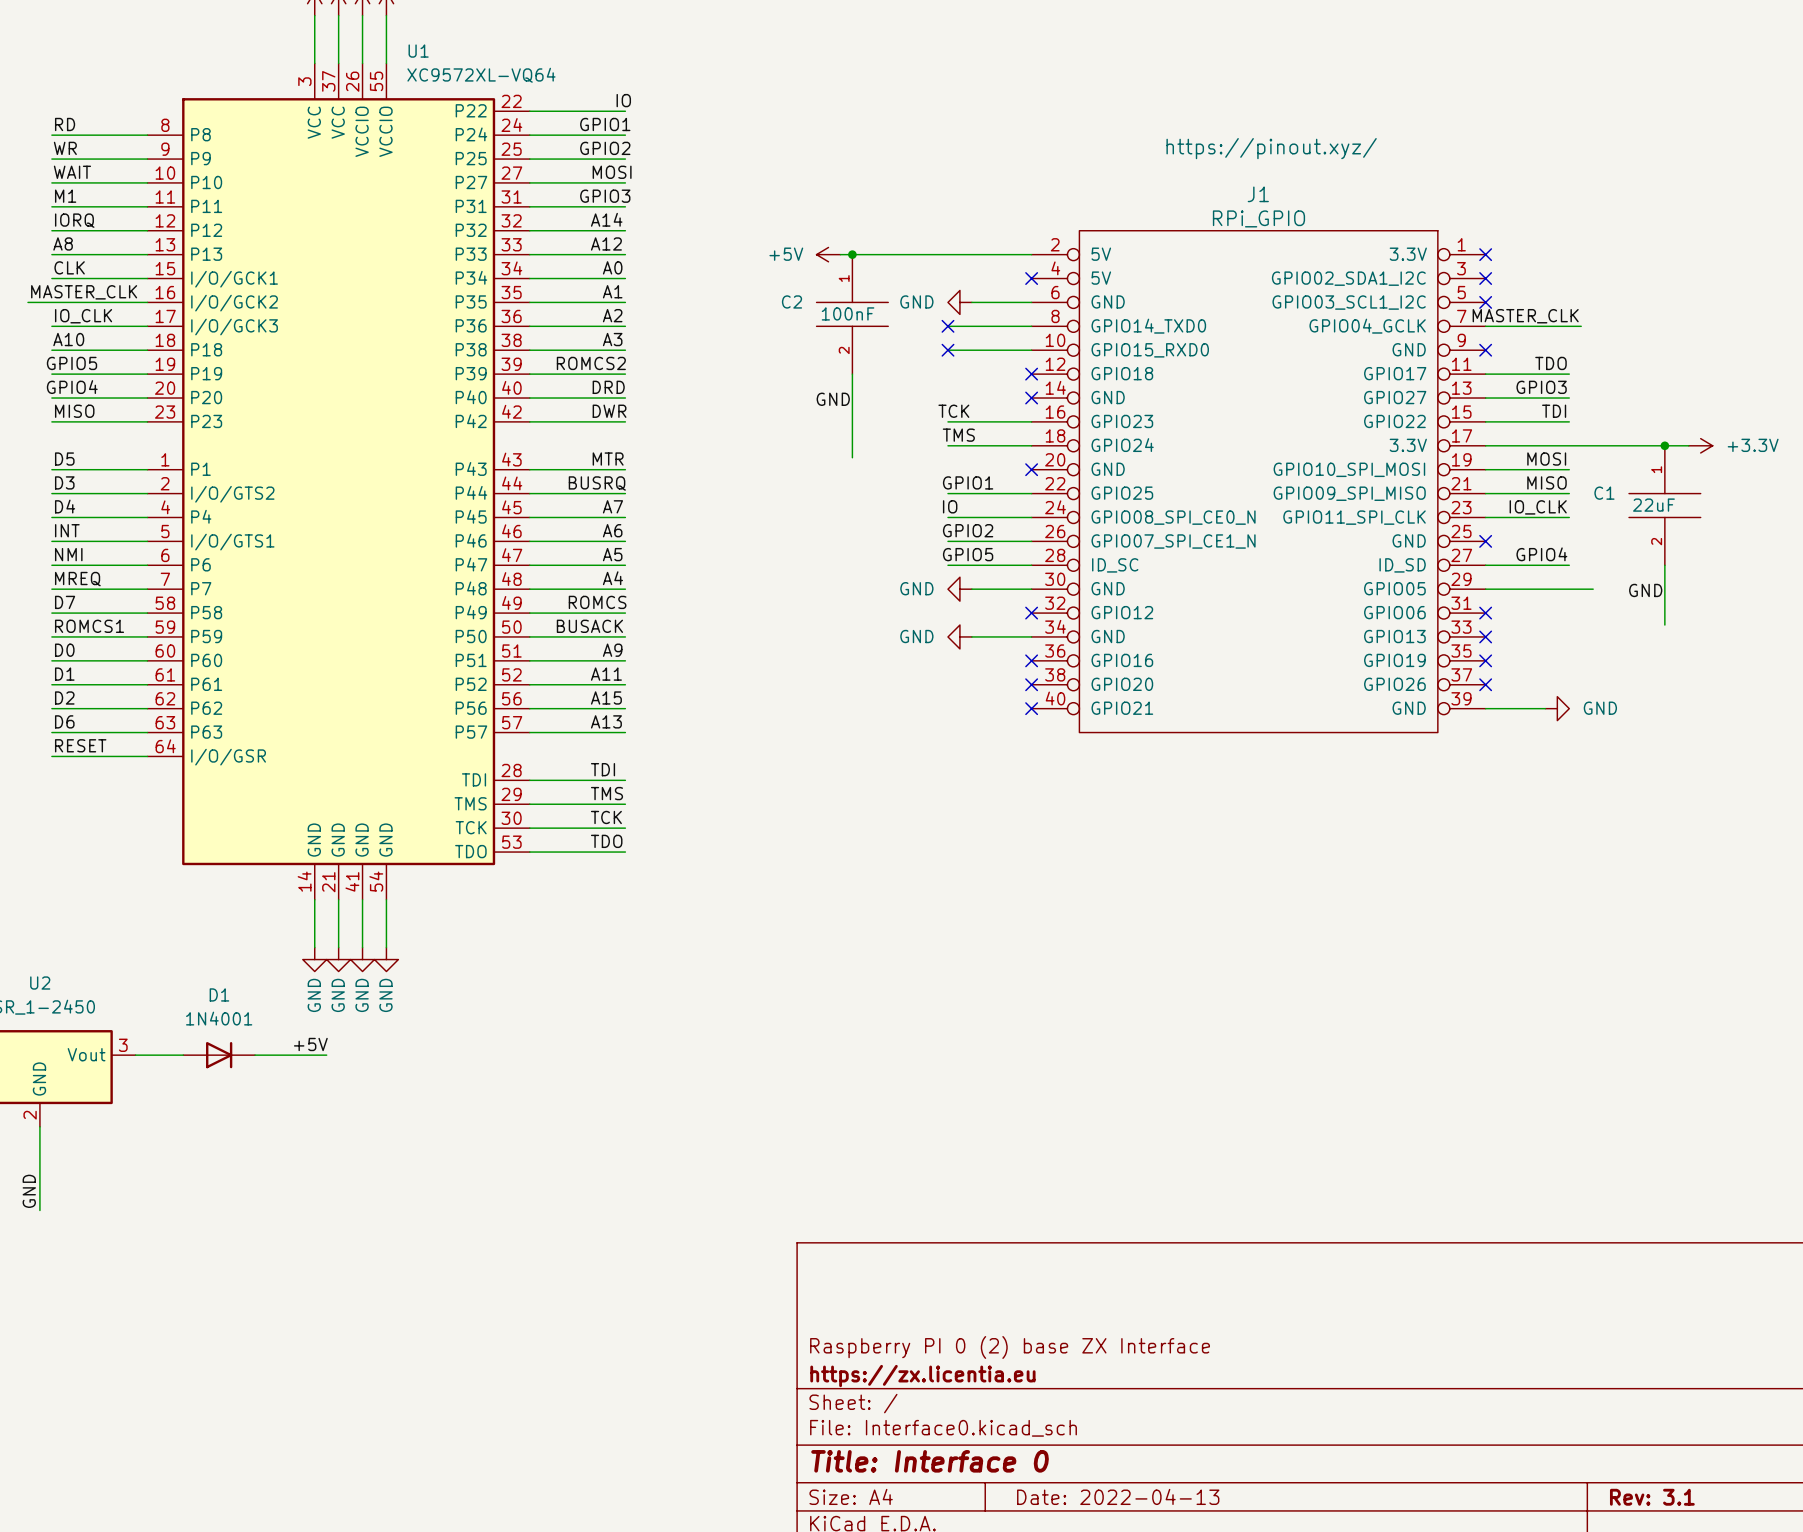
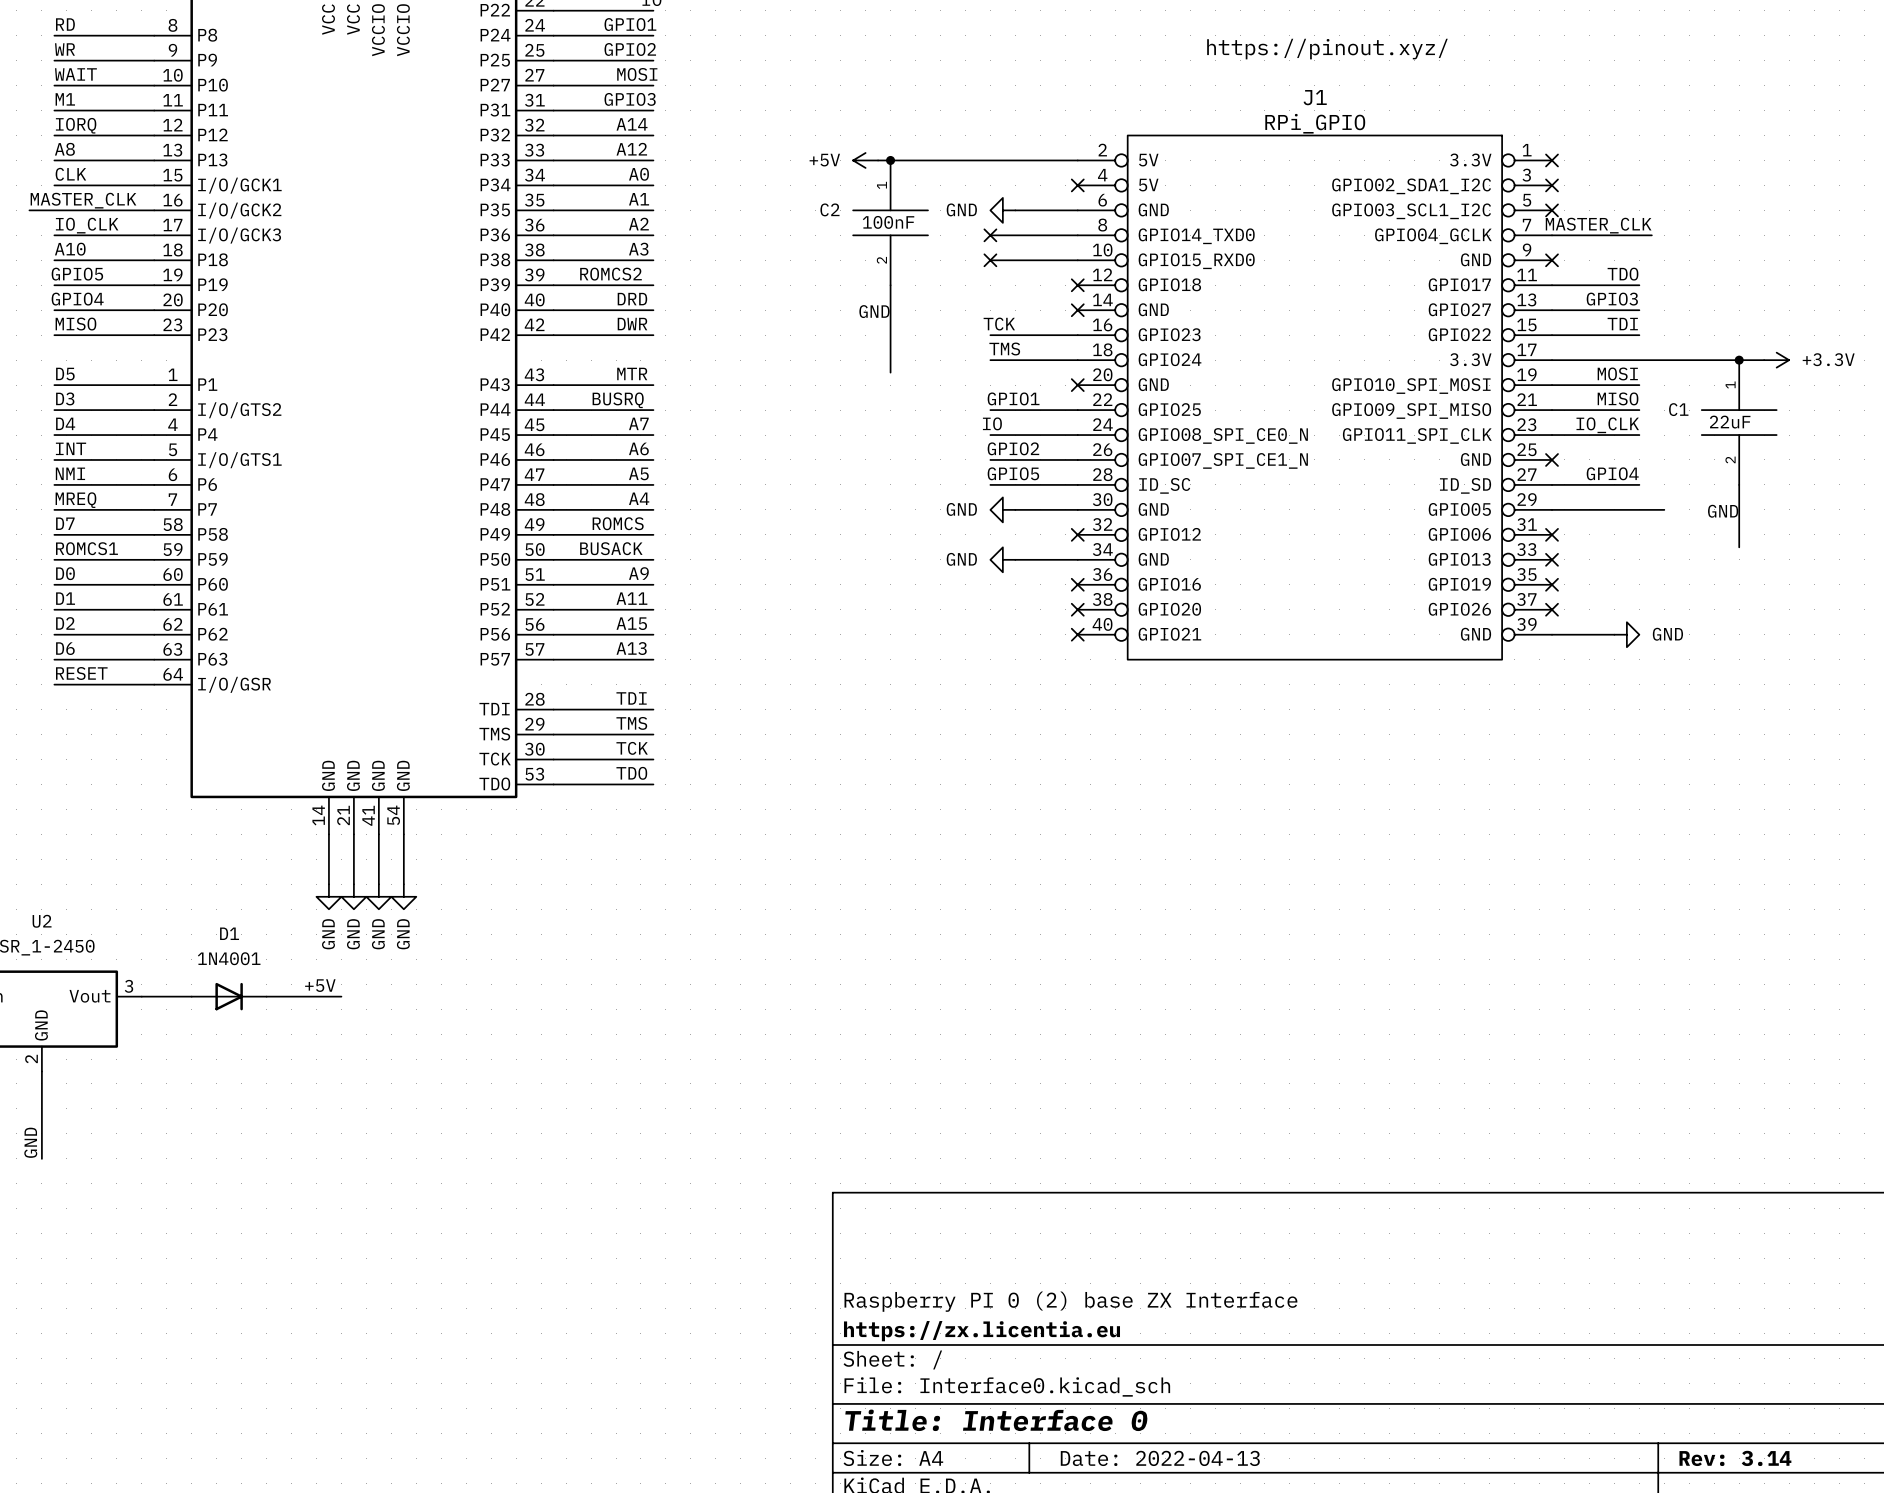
title block: Rev: 3.1 (1652, 1497) -> Rev: 3.14 (1735, 1458)

